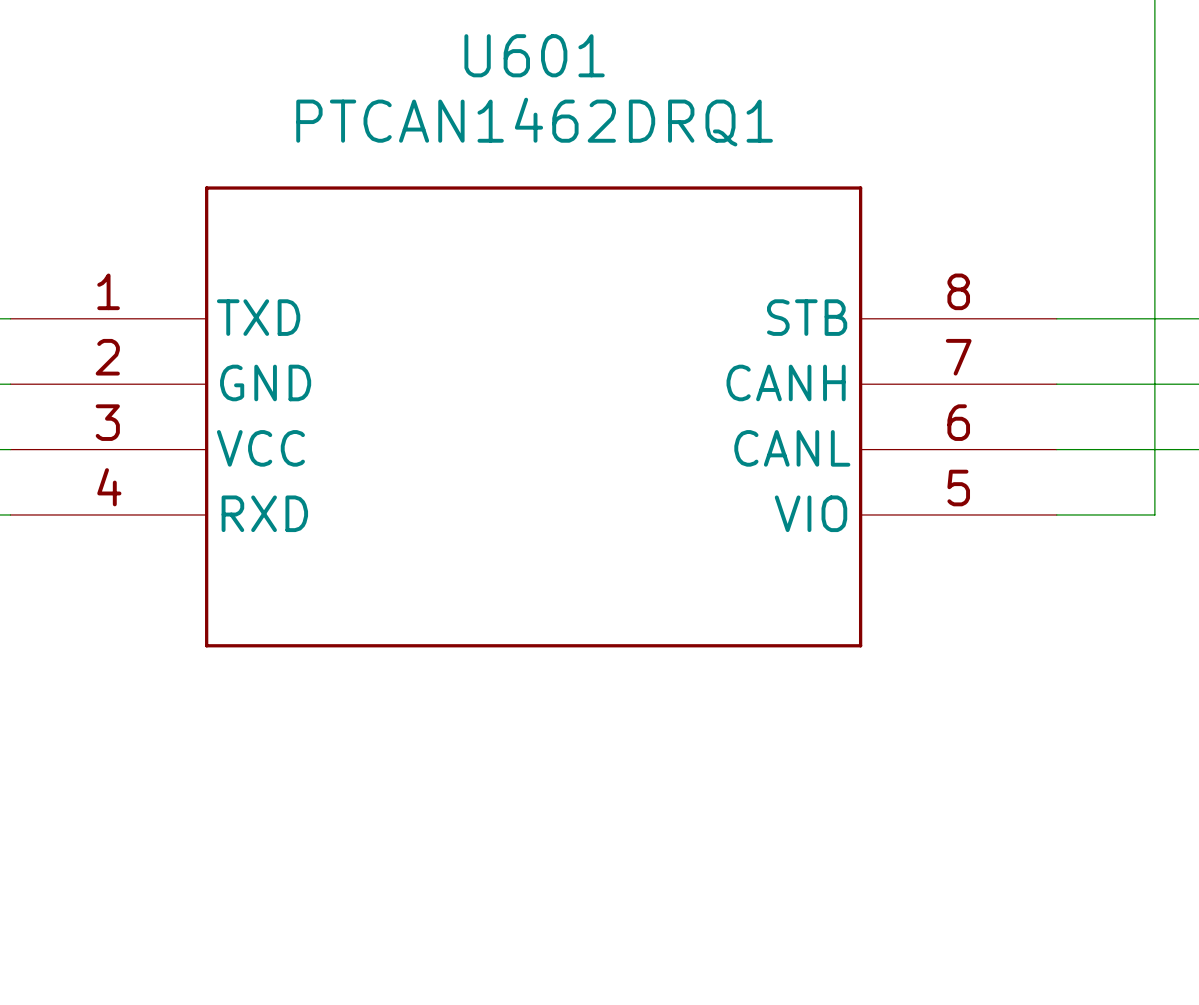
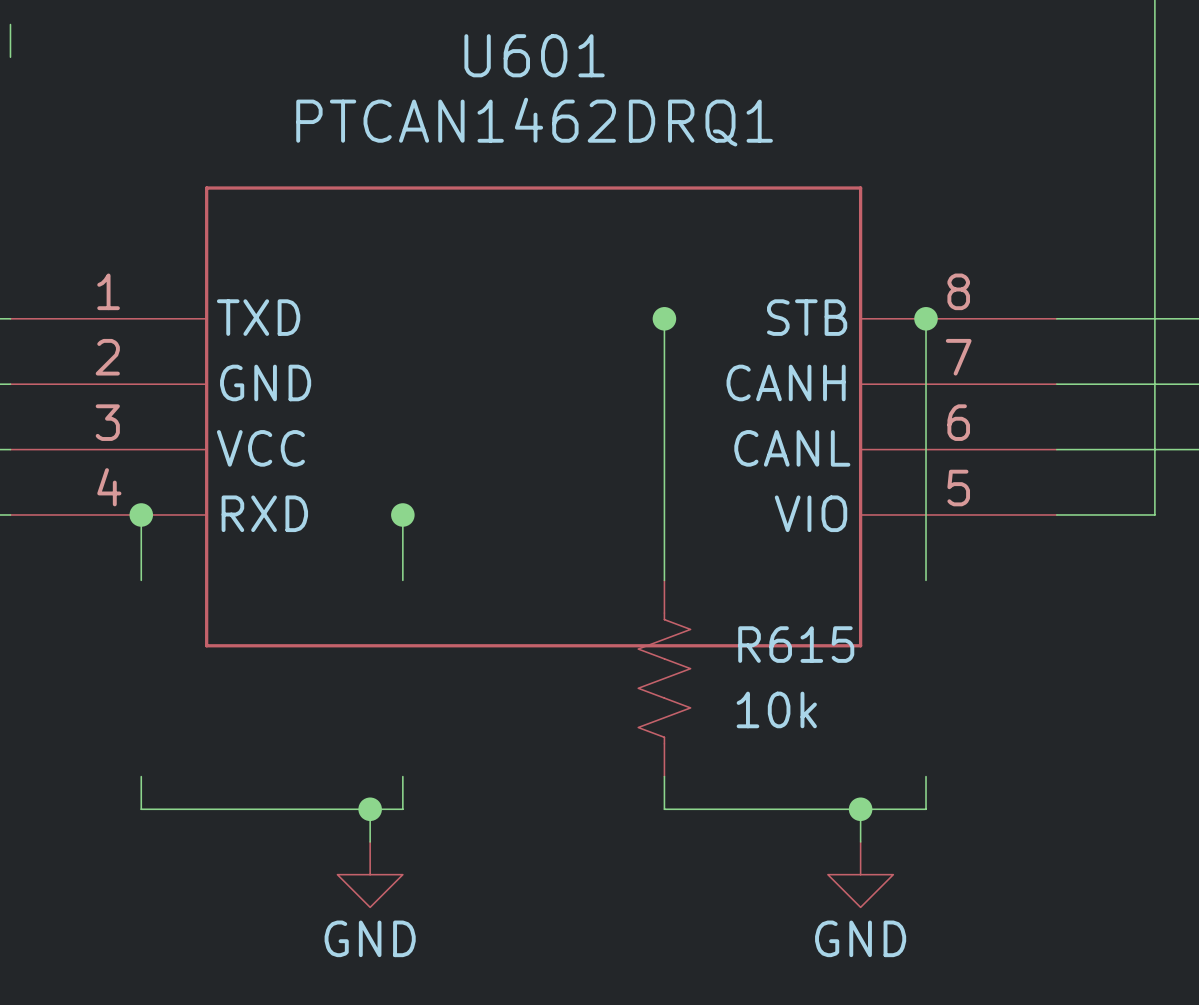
wire: none -> (10, 24) (10, 57)
wire: none -> (664, 318) (664, 580)
junction: none -> (664, 318)
wire: none -> (926, 318) (926, 580)
junction: none -> (926, 318)
wire: none -> (141, 514) (141, 580)
junction: none -> (141, 514)
wire: none -> (402, 514) (402, 580)
junction: none -> (402, 514)
R615: none -> 10k (664, 678)
wire: none -> (141, 776) (141, 809) (402, 809) (402, 776)
wire: none -> (664, 776) (664, 809) (926, 809) (926, 776)
wire: none -> (370, 809) (370, 841)
junction: none -> (370, 809)
wire: none -> (860, 809) (860, 841)
junction: none -> (860, 809)
power symbol: none -> GND (370, 874)
power symbol: none -> GND (860, 874)

